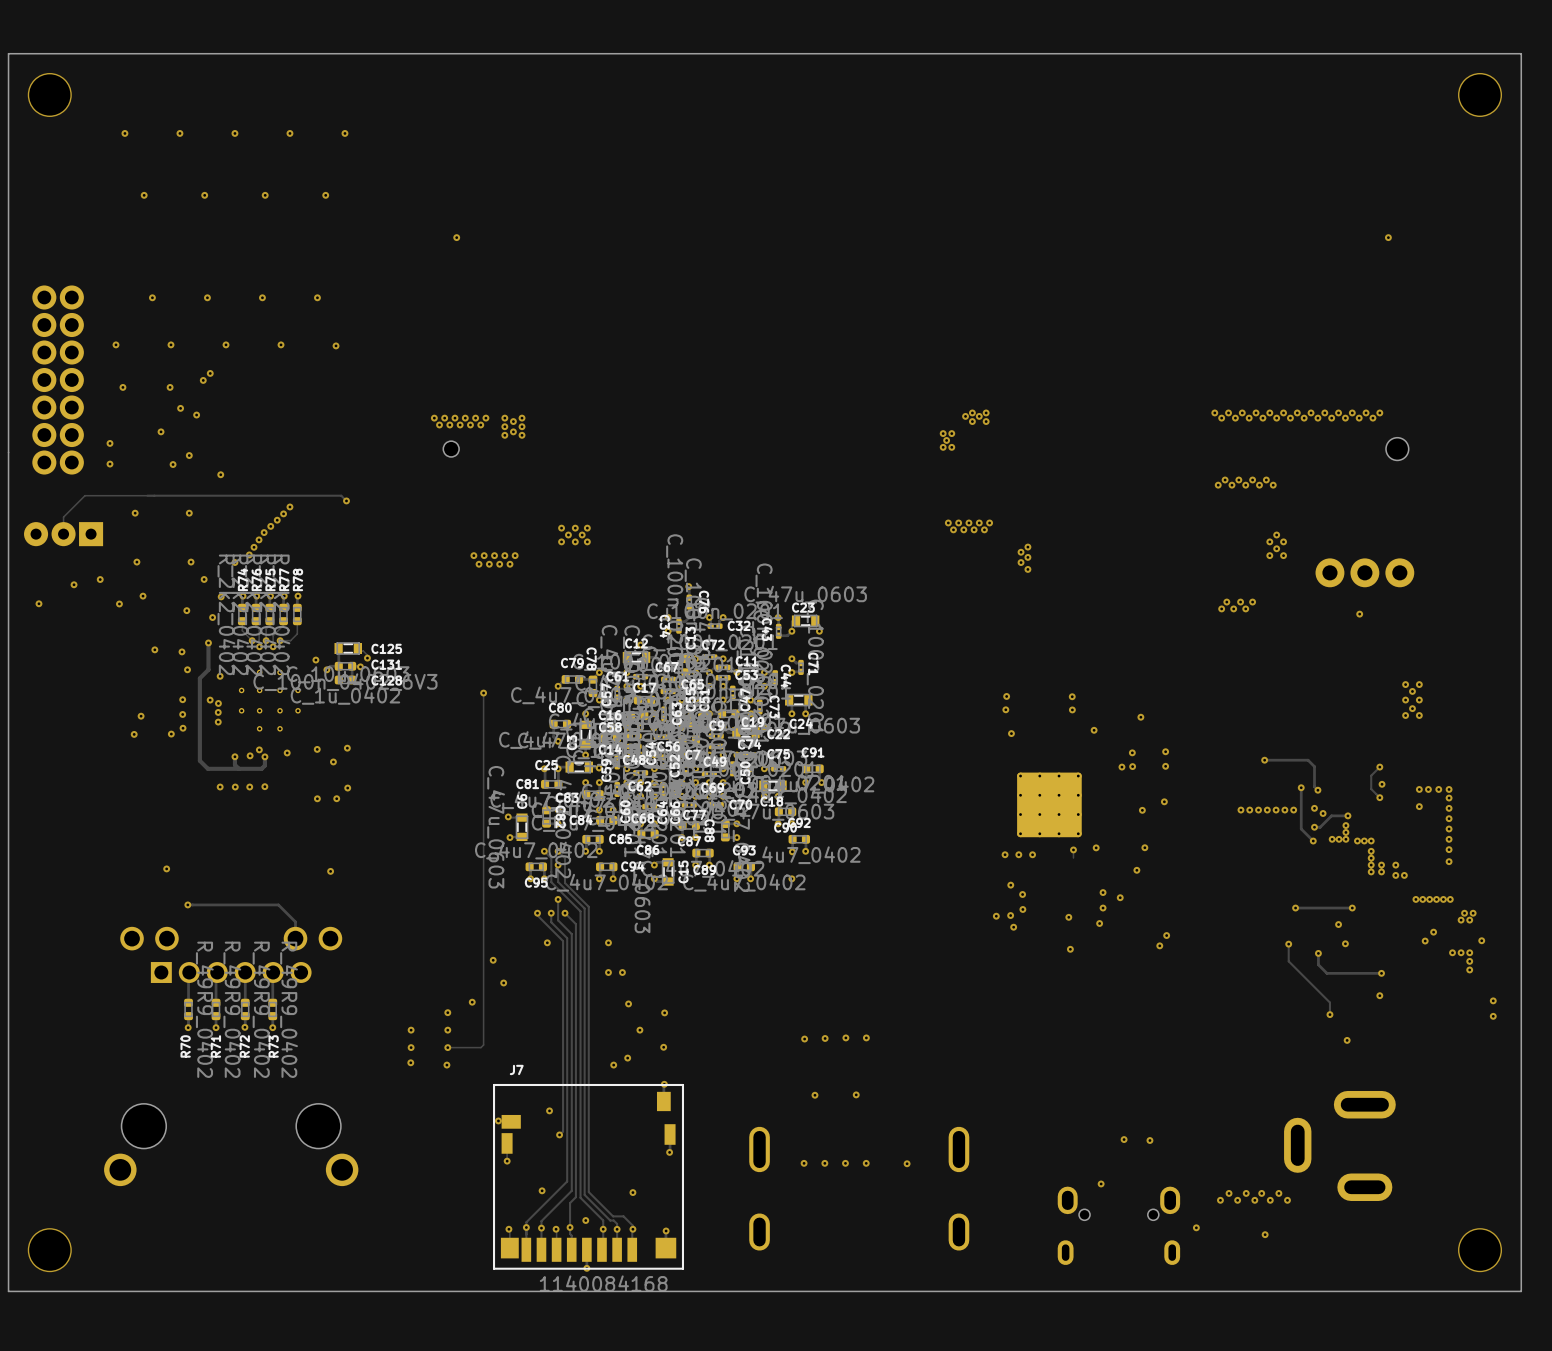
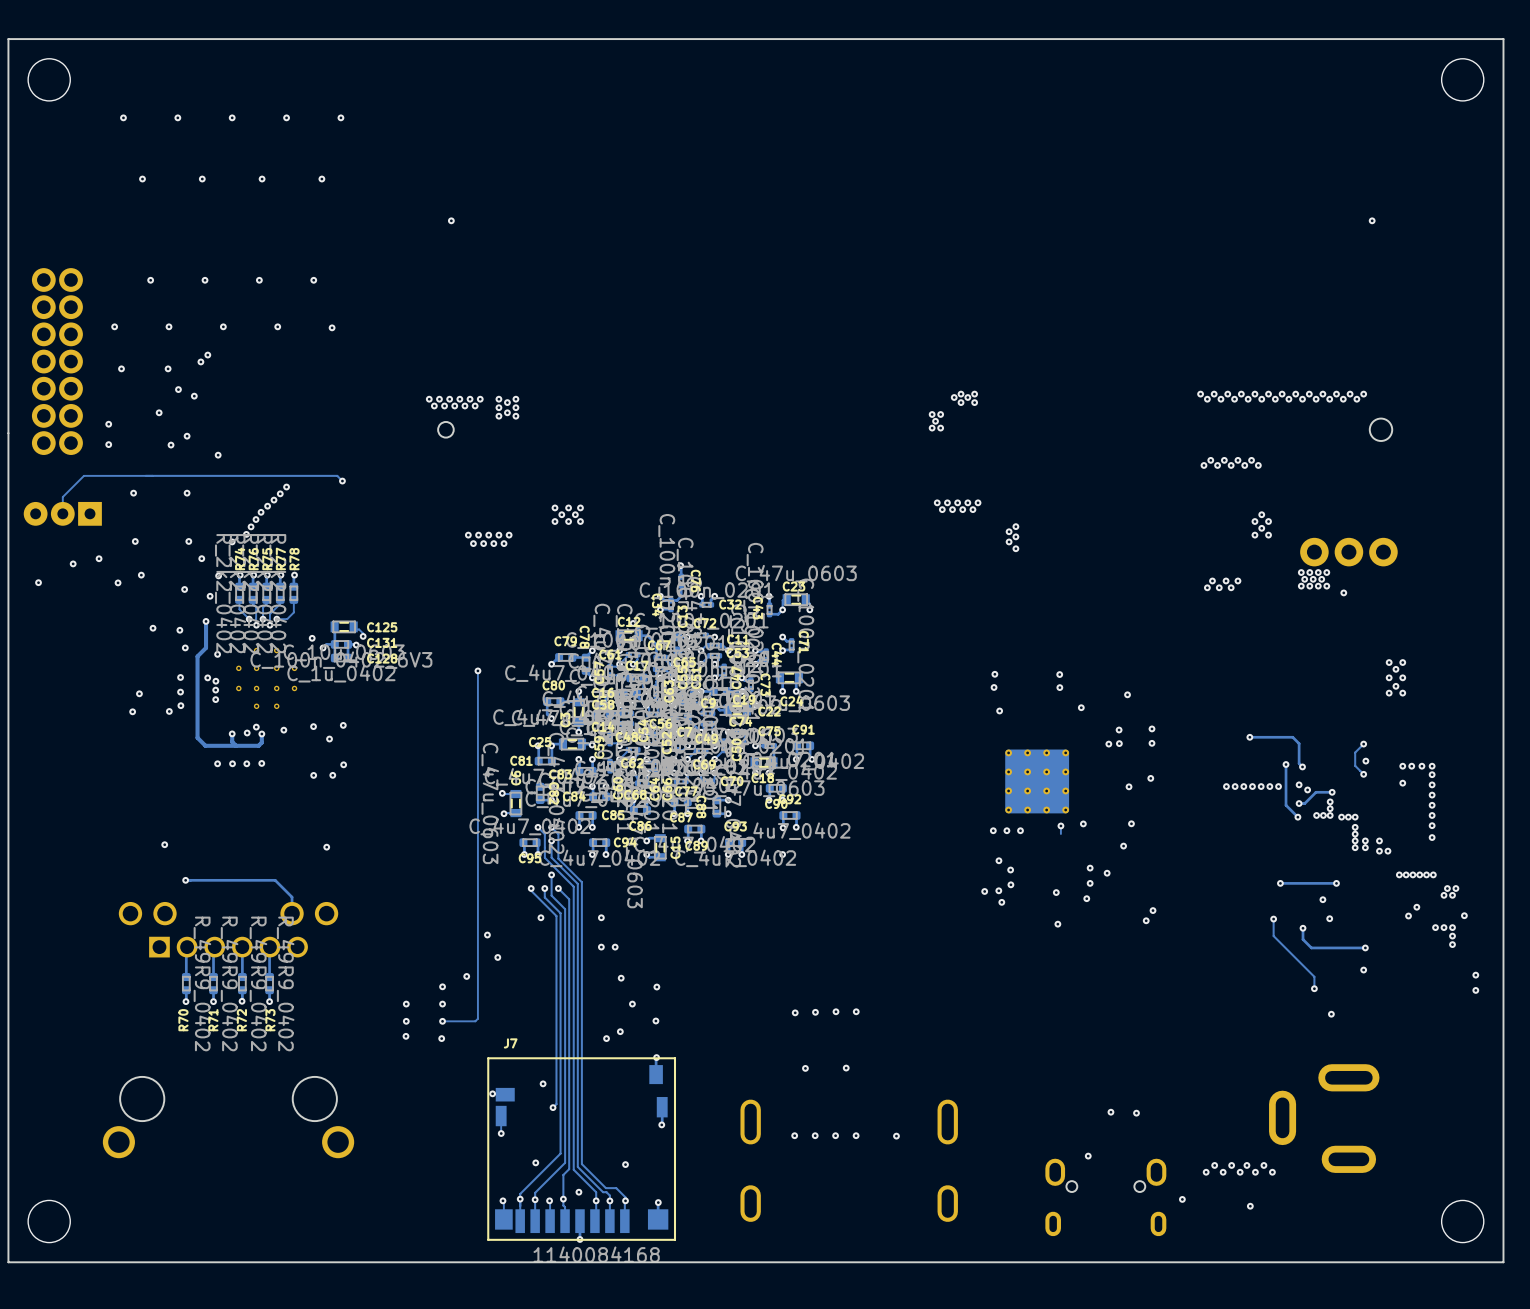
via: none -> (1301, 572)
via: none -> (1309, 572)
via: none -> (1318, 572)
via: none -> (1326, 572)
via: none -> (1304, 579)
via: none -> (1313, 579)
via: none -> (1321, 579)
via: none -> (1301, 586)
via: none -> (1309, 586)
via: none -> (1318, 586)
via: none -> (1326, 586)

